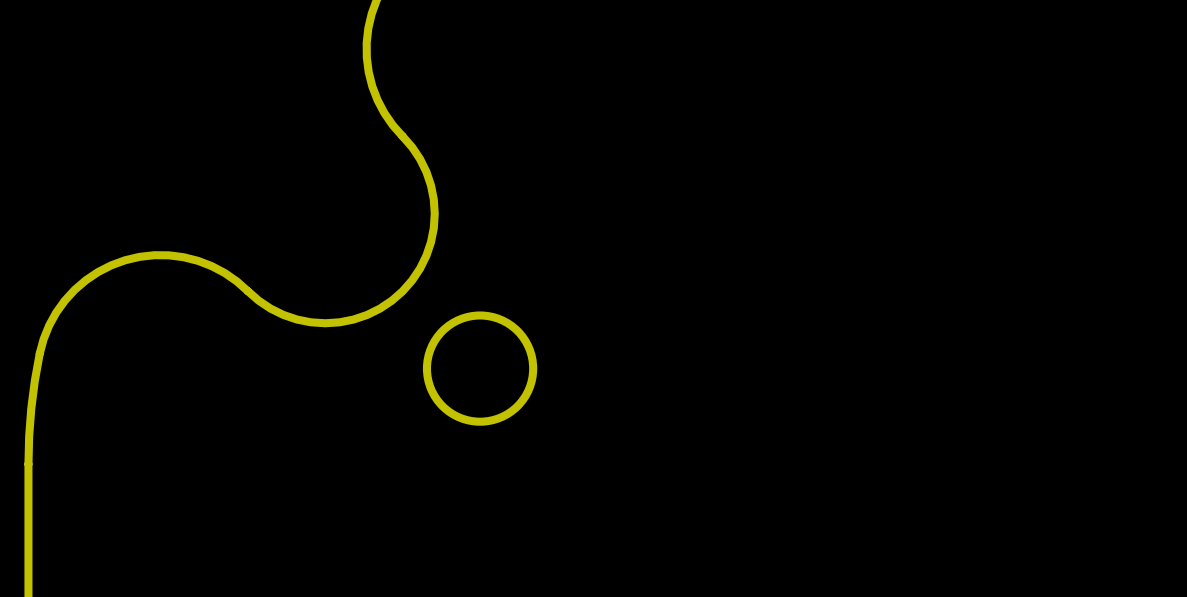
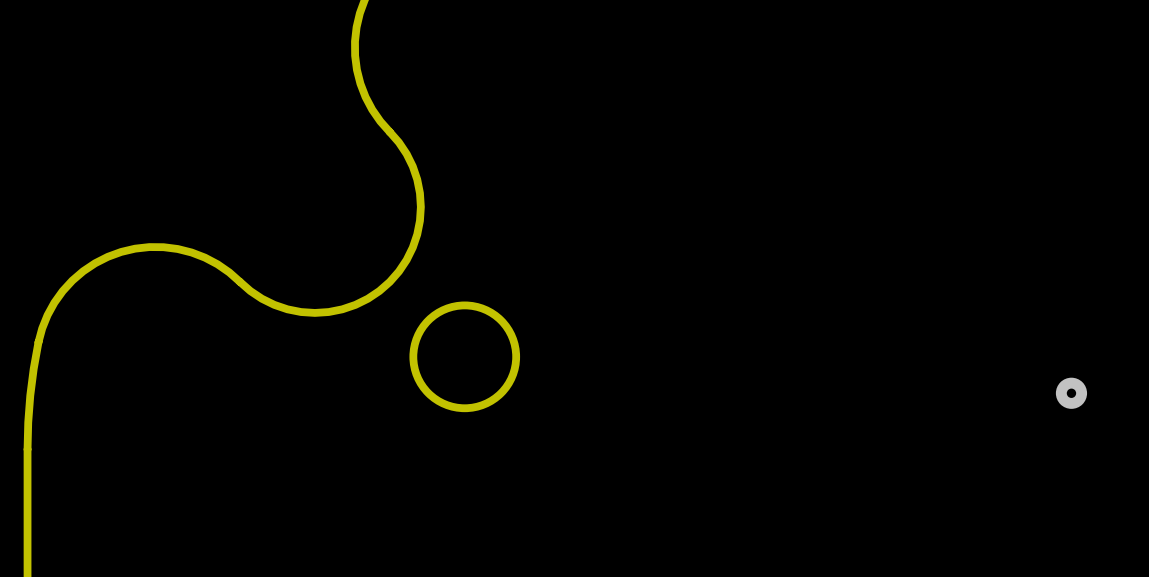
via: none -> (1071, 393)

